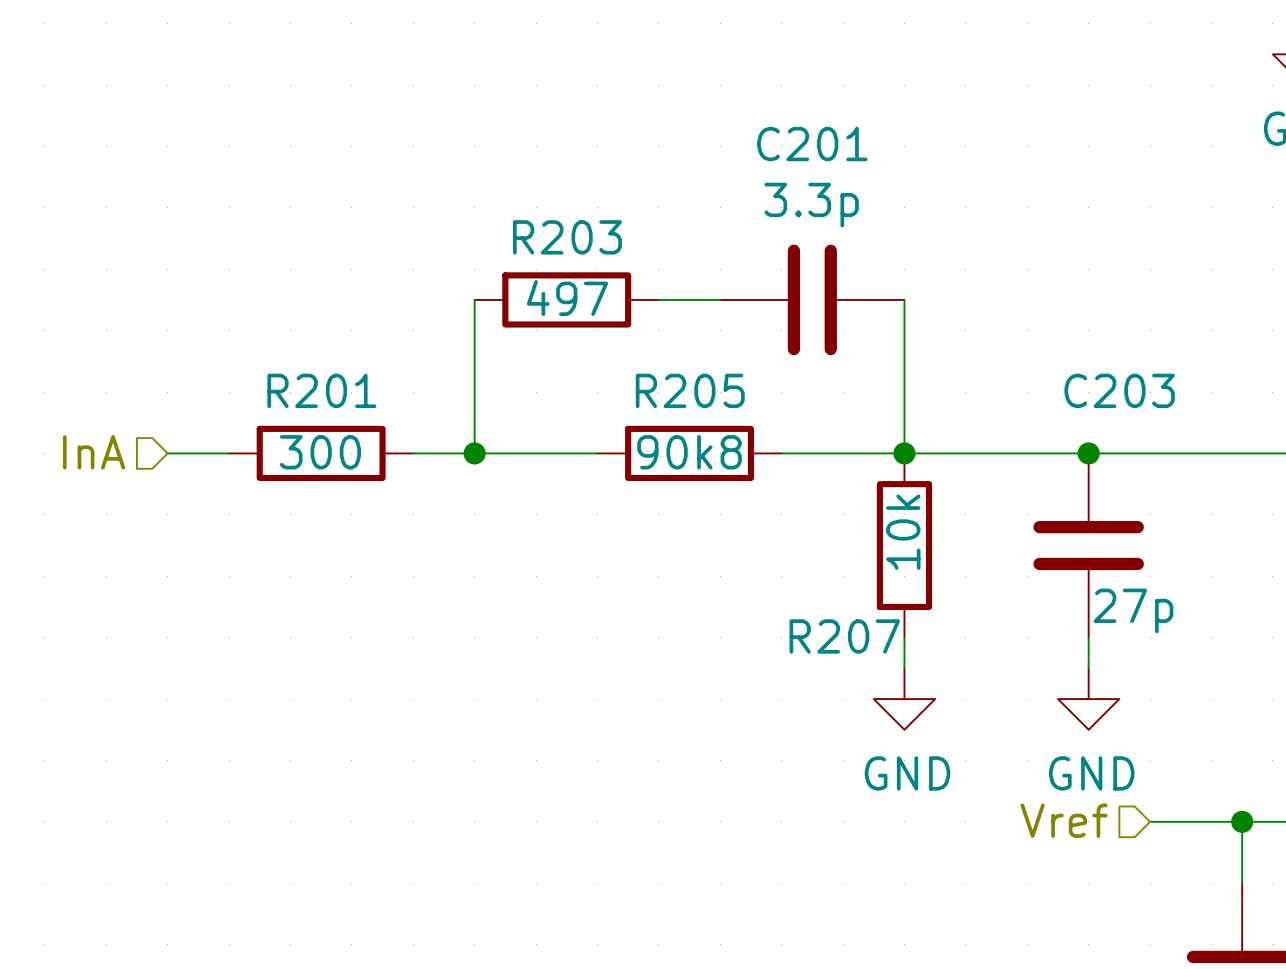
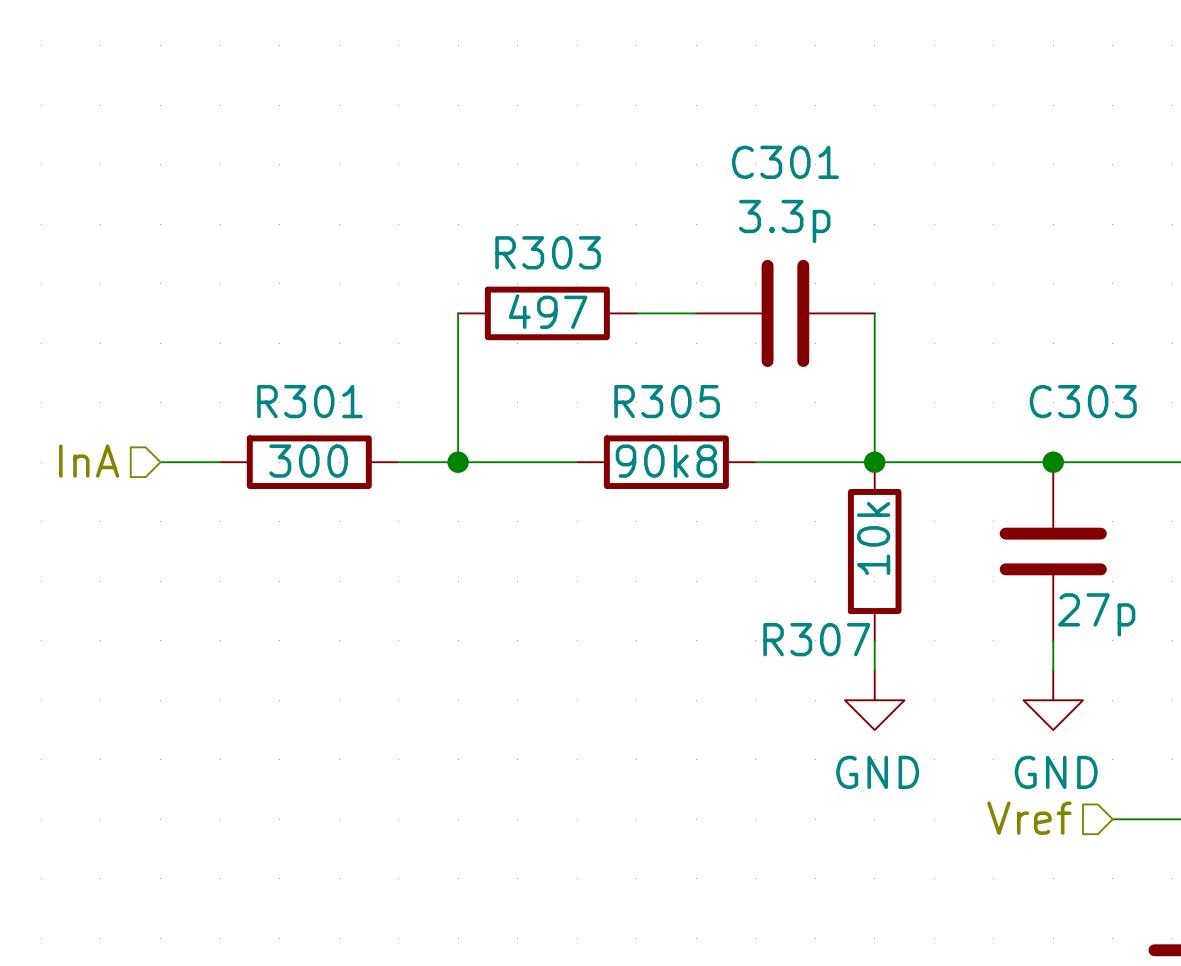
C201 name: C201 (812, 144) -> C301 (785, 162)
R203 name: R203 (567, 237) -> R303 (548, 252)
R201 name: R201 (321, 390) -> R301 (310, 401)
R205 name: R205 (690, 390) -> R305 (667, 401)
C203 name: C203 (1119, 390) -> C303 (1083, 401)
R207 name: R207 (844, 636) -> R307 (816, 639)

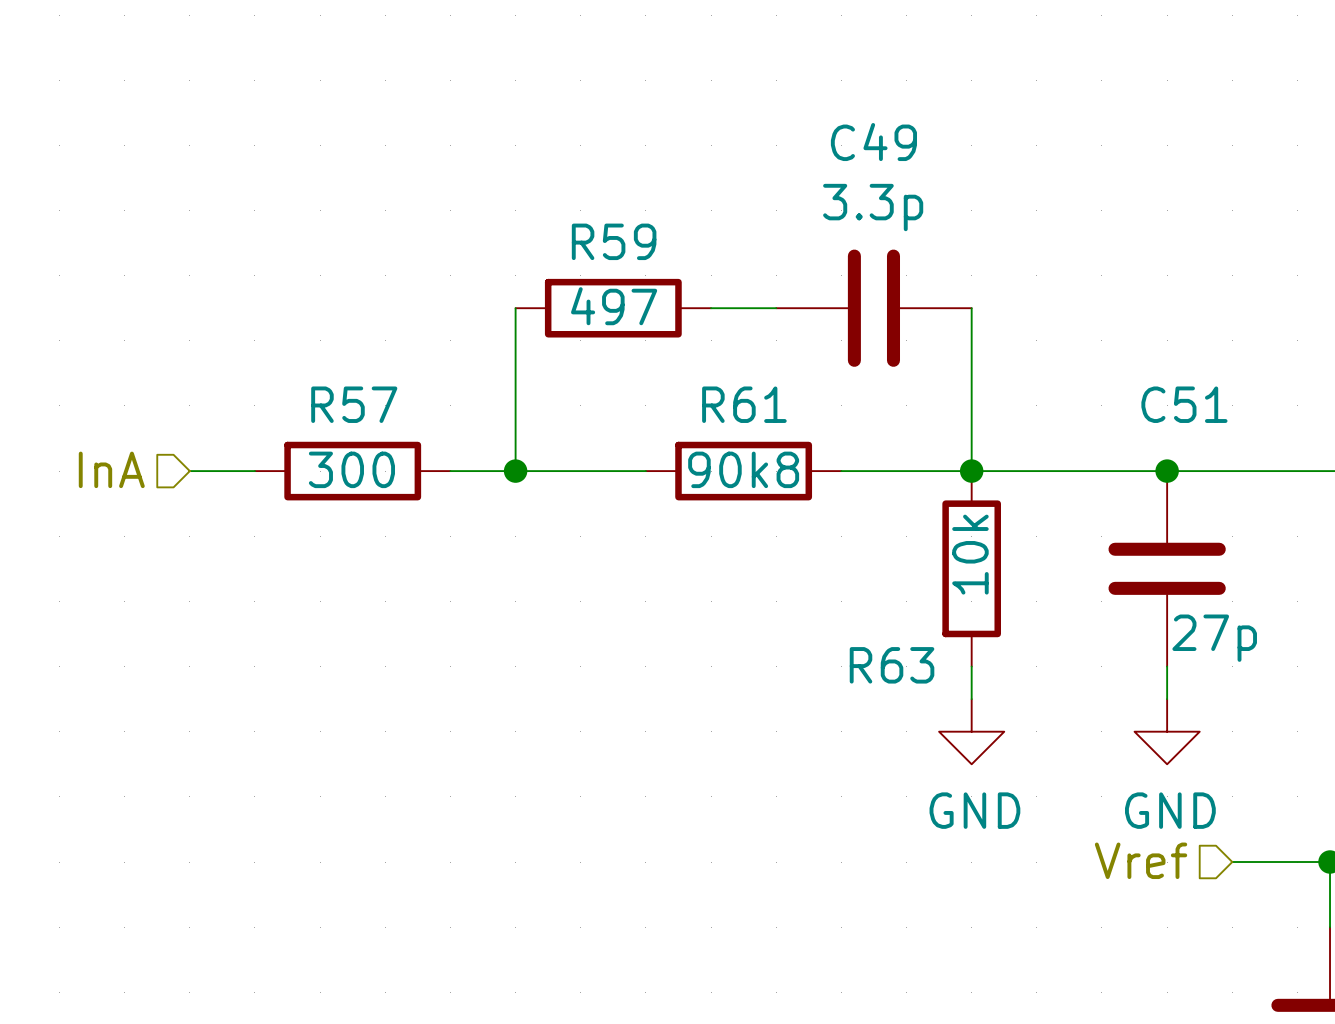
C301 name: C301 (785, 162) -> C49 (873, 142)
R303 name: R303 (548, 252) -> R59 (614, 241)
R301 name: R301 (310, 401) -> R57 (354, 404)
R305 name: R305 (667, 401) -> R61 (744, 404)
C303 name: C303 (1083, 401) -> C51 (1184, 404)
R307 name: R307 (816, 639) -> R63 (892, 665)

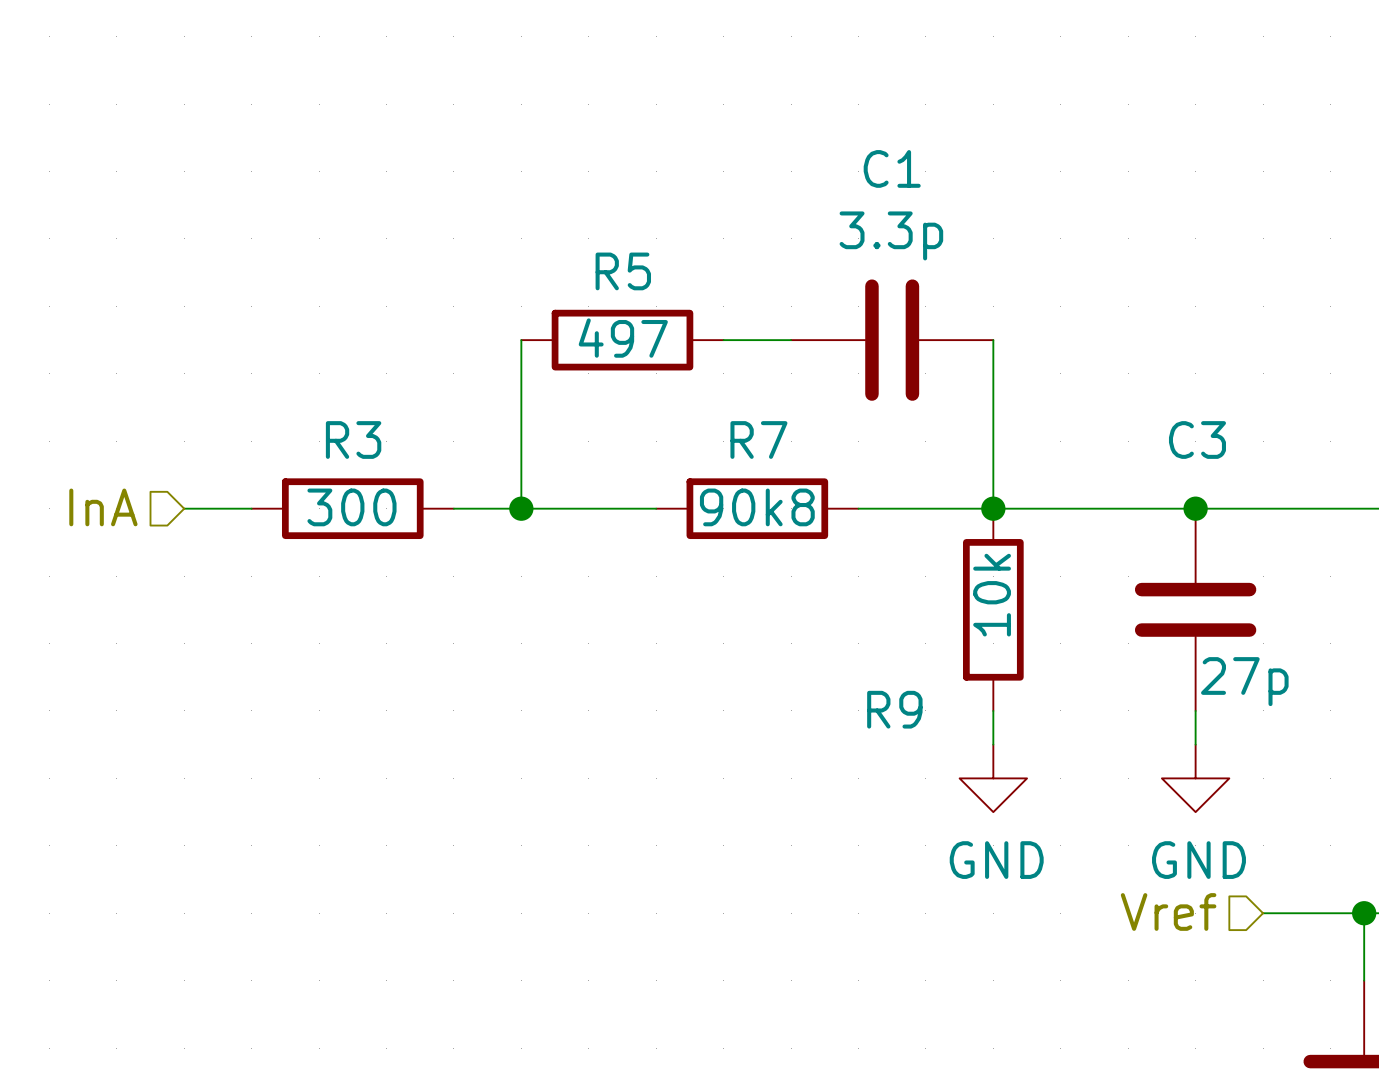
C49 name: C49 (873, 142) -> C1 (892, 168)
R59 name: R59 (614, 241) -> R5 (623, 271)
R57 name: R57 (354, 404) -> R3 (353, 440)
R61 name: R61 (744, 404) -> R7 (758, 440)
C51 name: C51 (1184, 404) -> C3 (1197, 440)
R63 name: R63 (892, 665) -> R9 (894, 709)

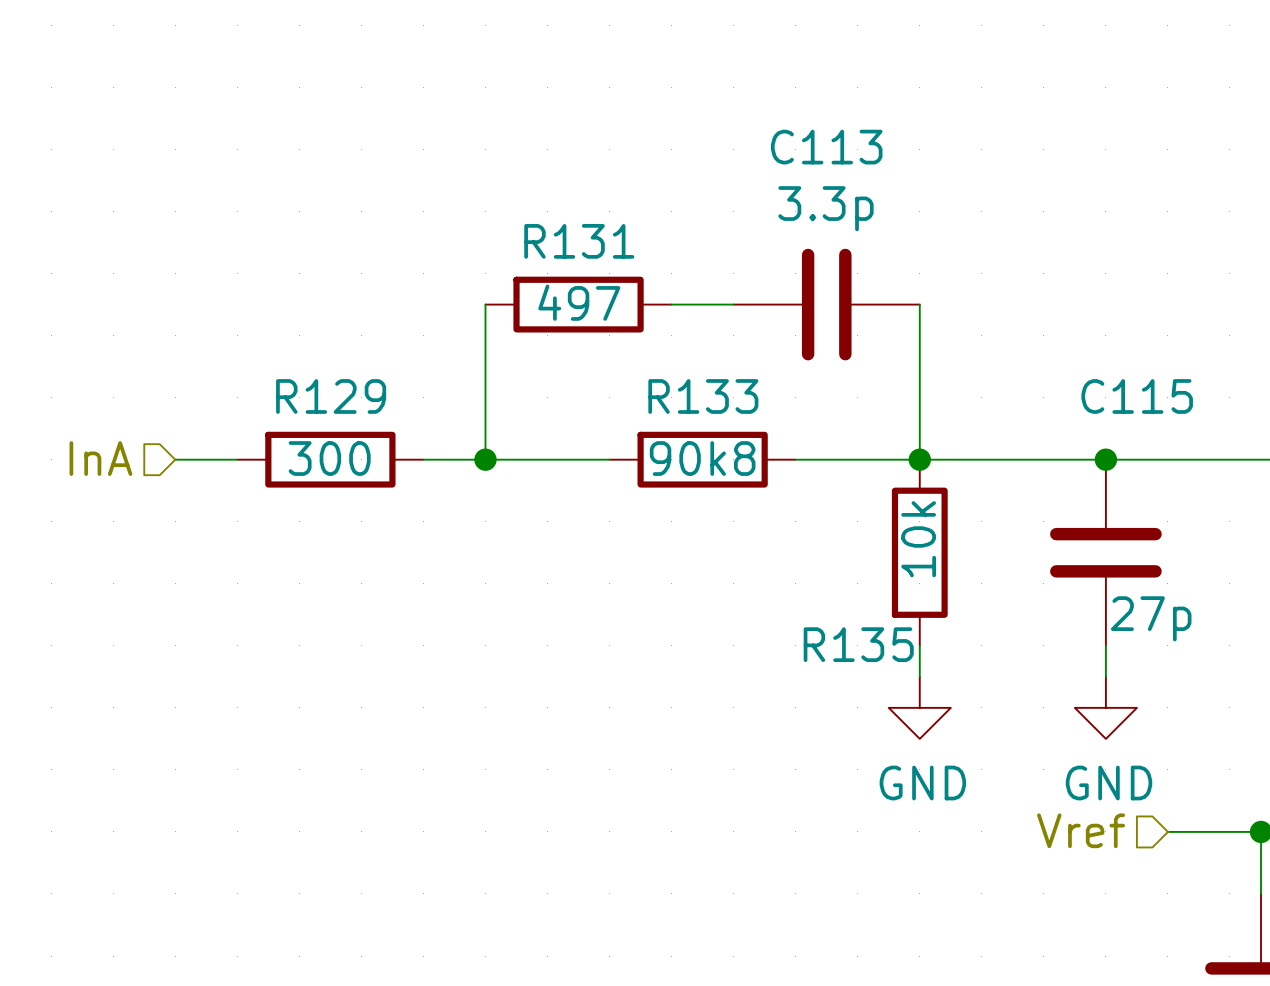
C1 name: C1 (892, 168) -> C113 (826, 147)
R5 name: R5 (623, 271) -> R131 (579, 241)
R3 name: R3 (353, 440) -> R129 (331, 396)
R7 name: R7 (758, 440) -> R133 (703, 396)
C3 name: C3 (1197, 440) -> C115 (1137, 396)
R9 name: R9 (894, 709) -> R135 (858, 644)

